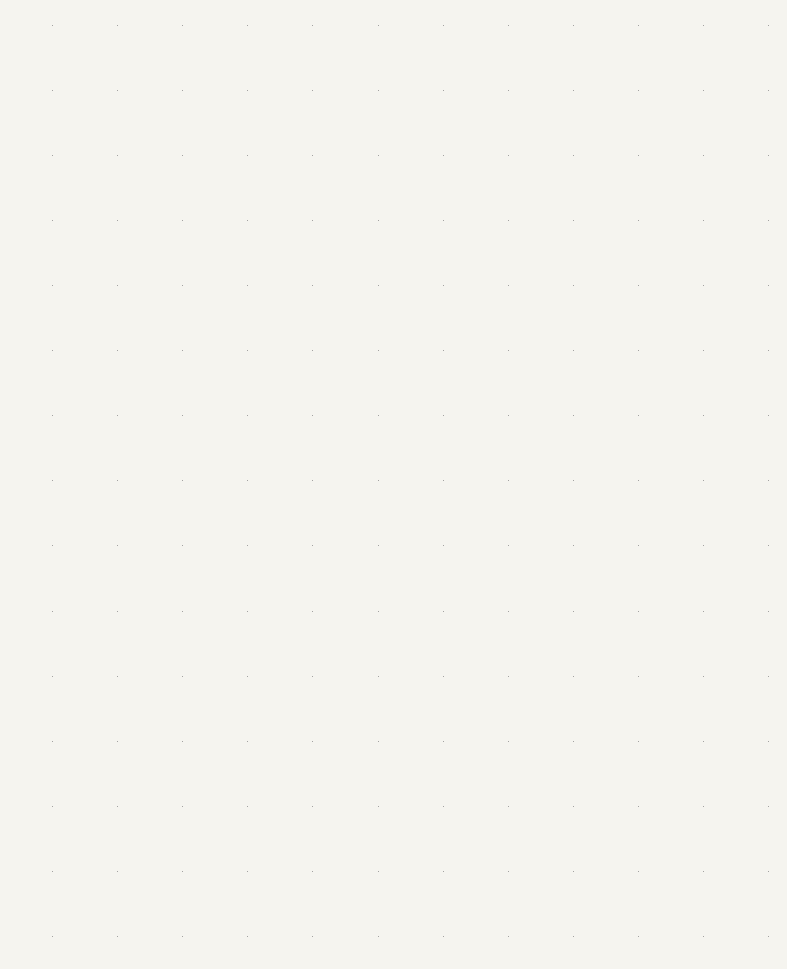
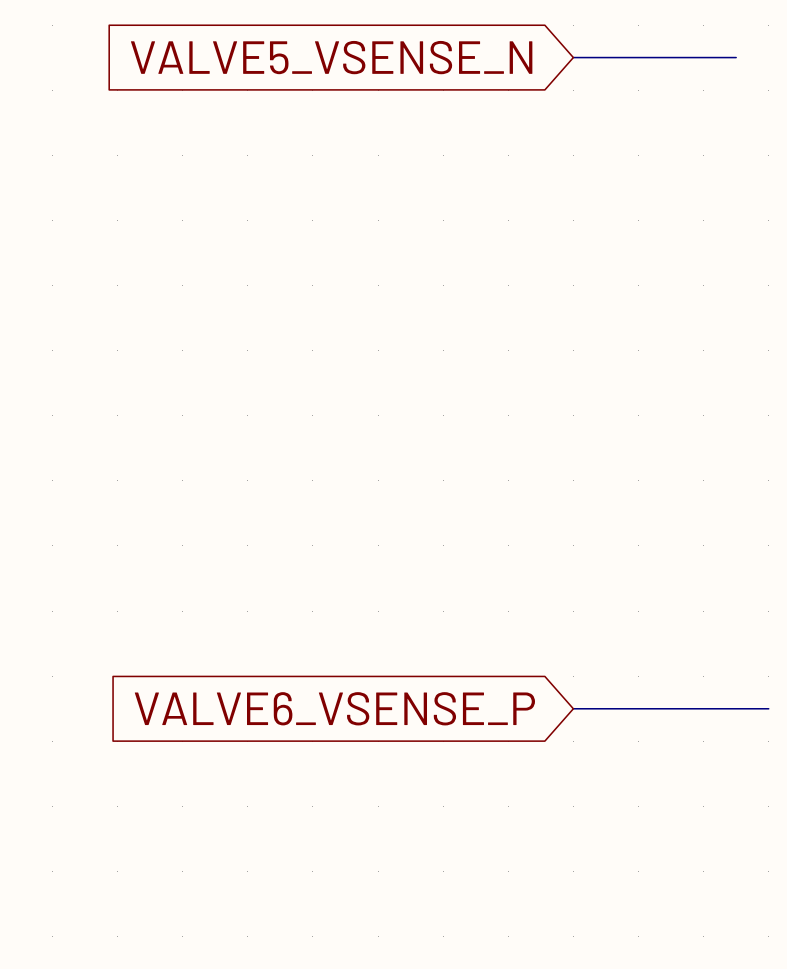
wire: none -> (573, 57) (736, 57)
global label: none -> VALVE5_VSENSE_N (331, 57)
wire: none -> (573, 708) (768, 708)
global label: none -> VALVE6_VSENSE_P (334, 708)

